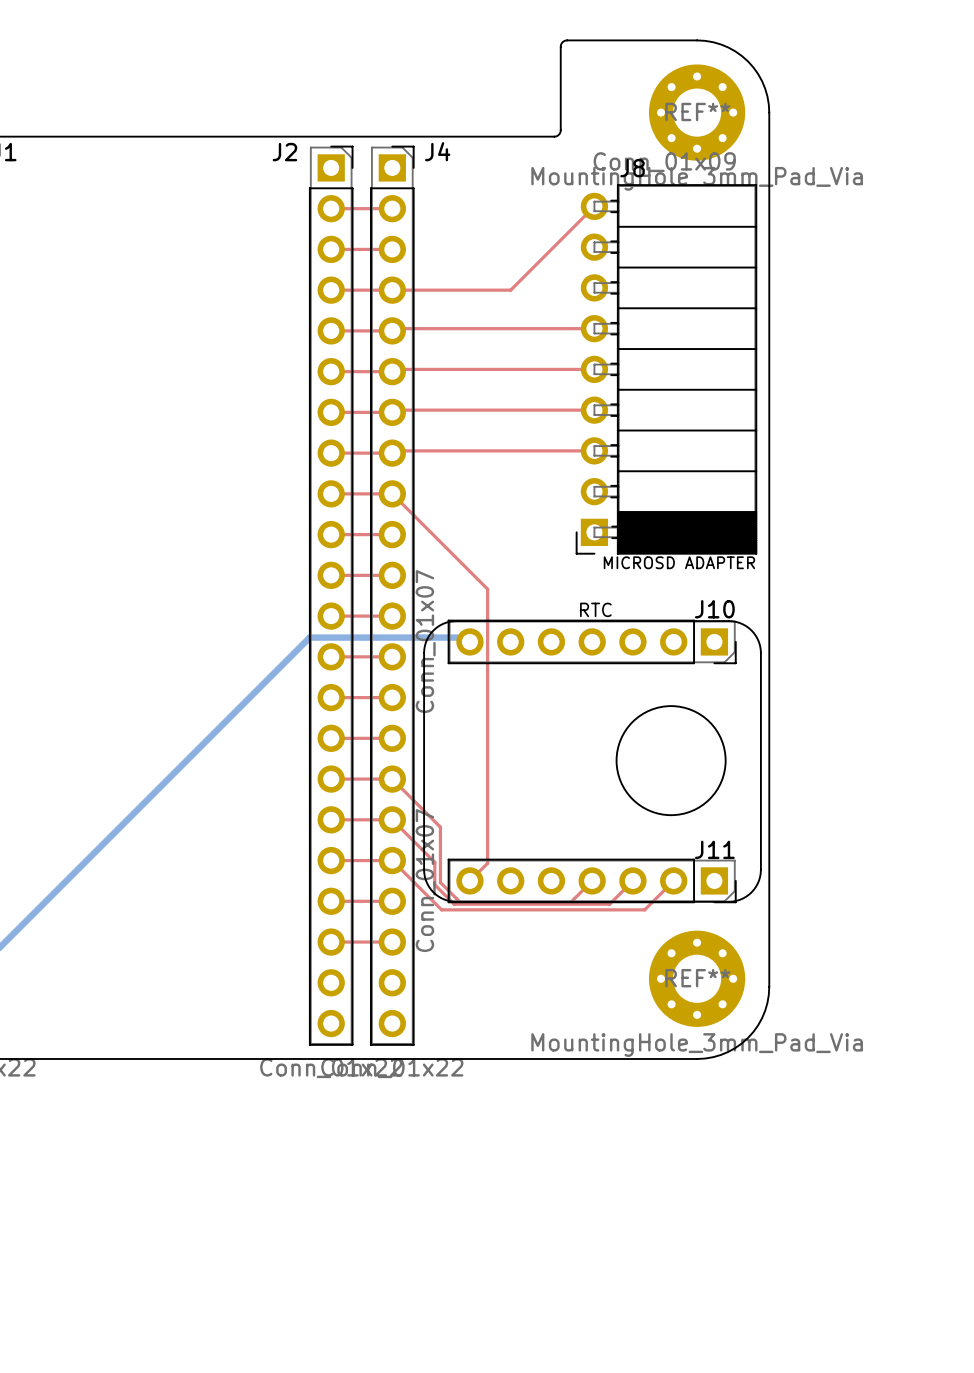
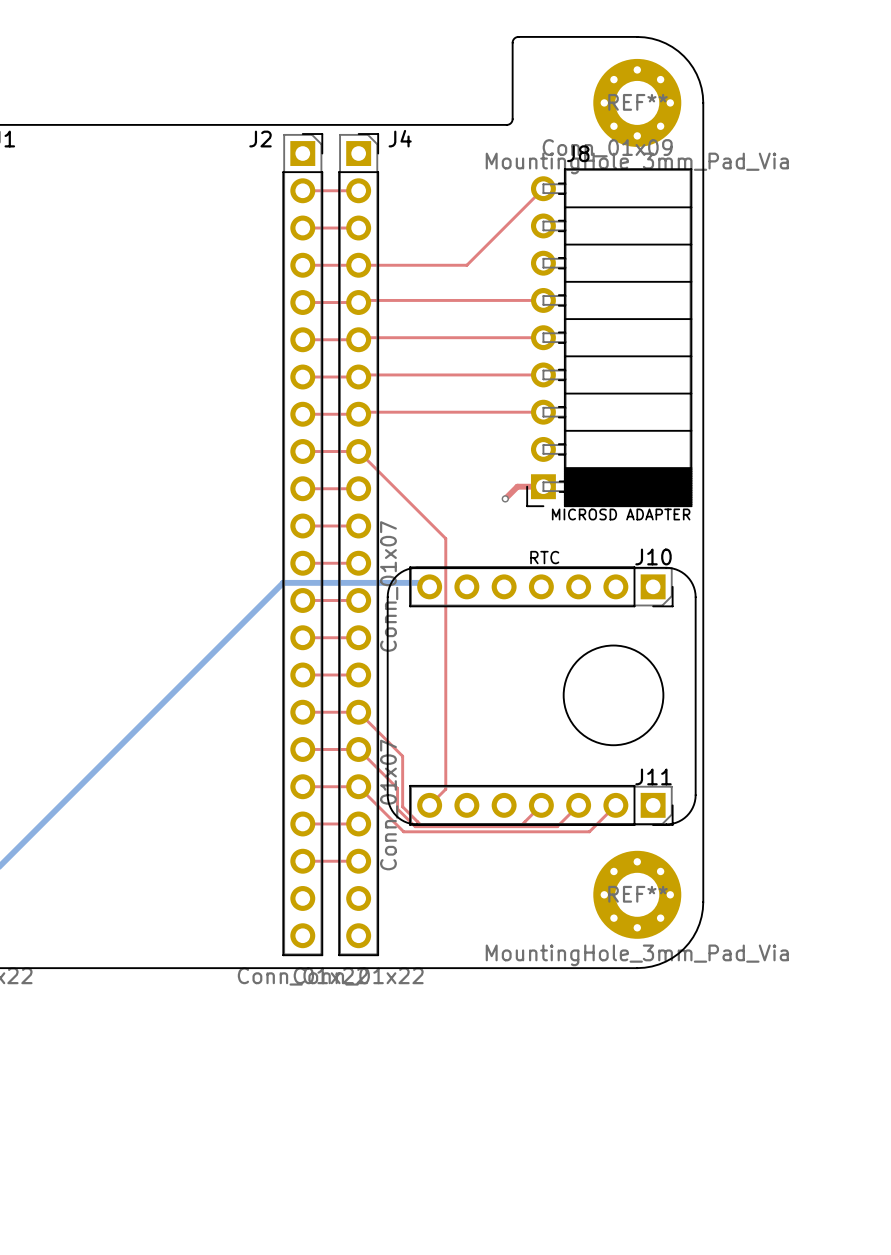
top track: none -> (543, 486) (517, 486) (505, 498)
via: none -> (505, 498)

